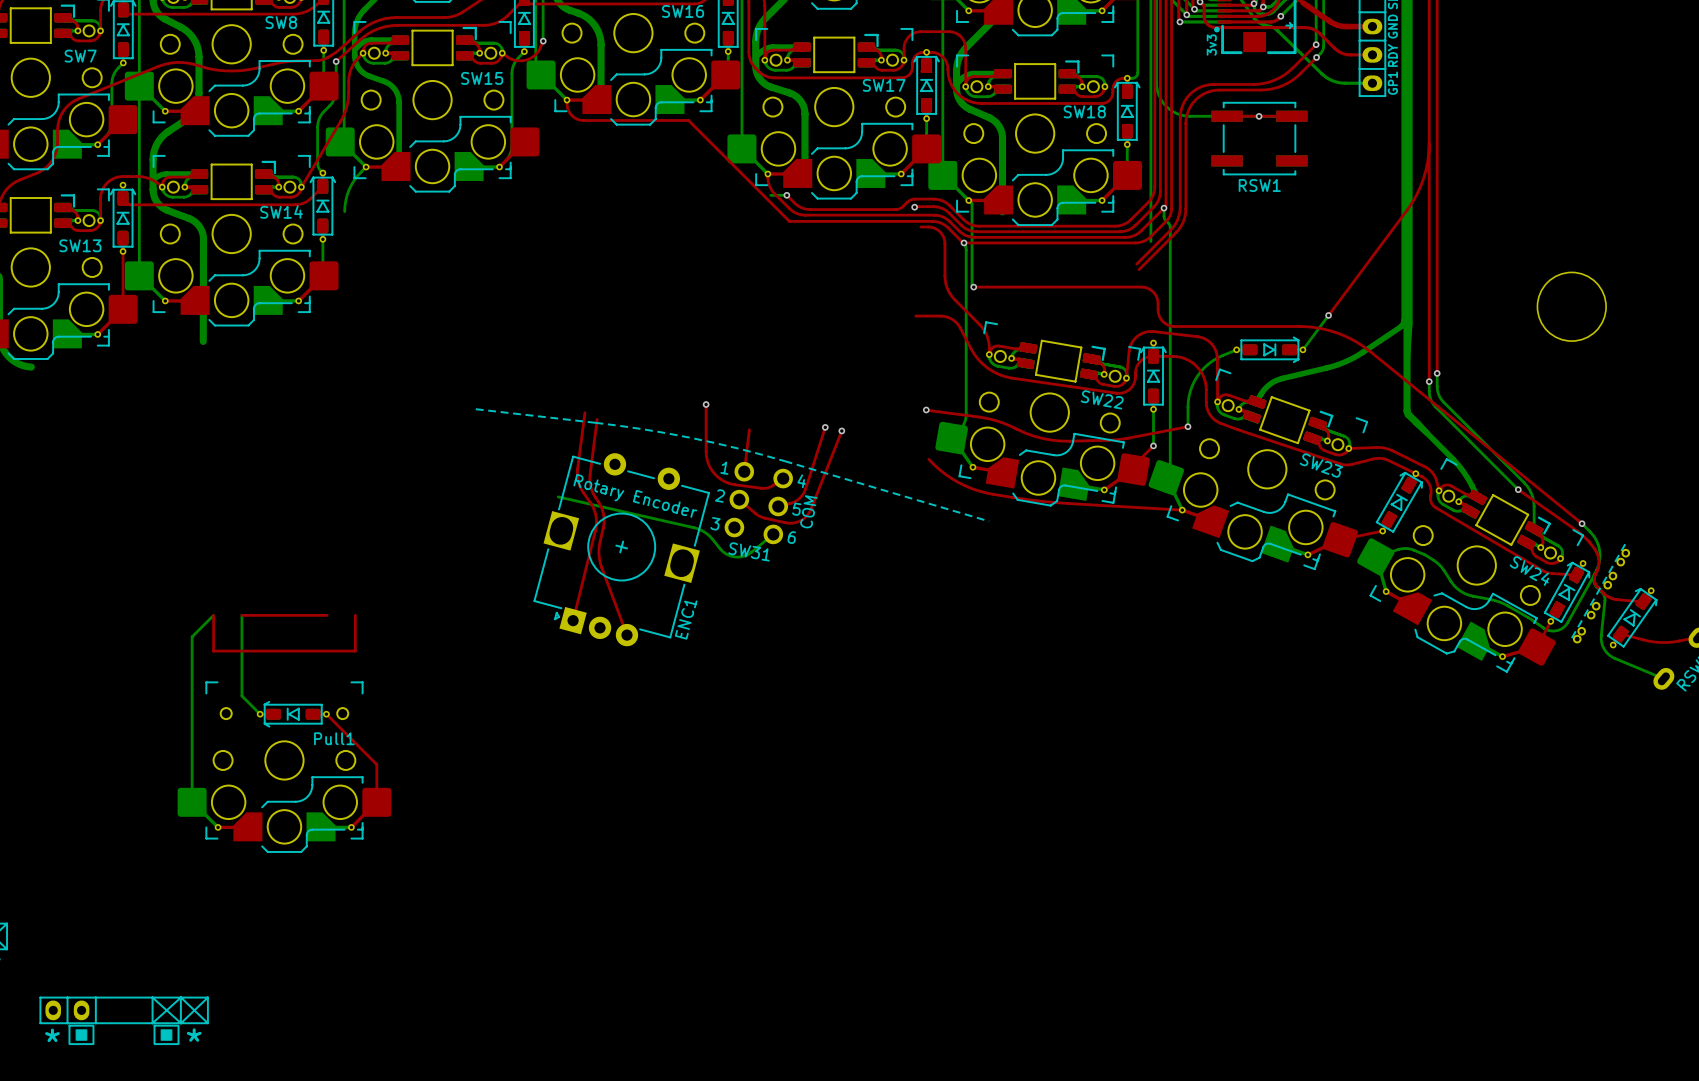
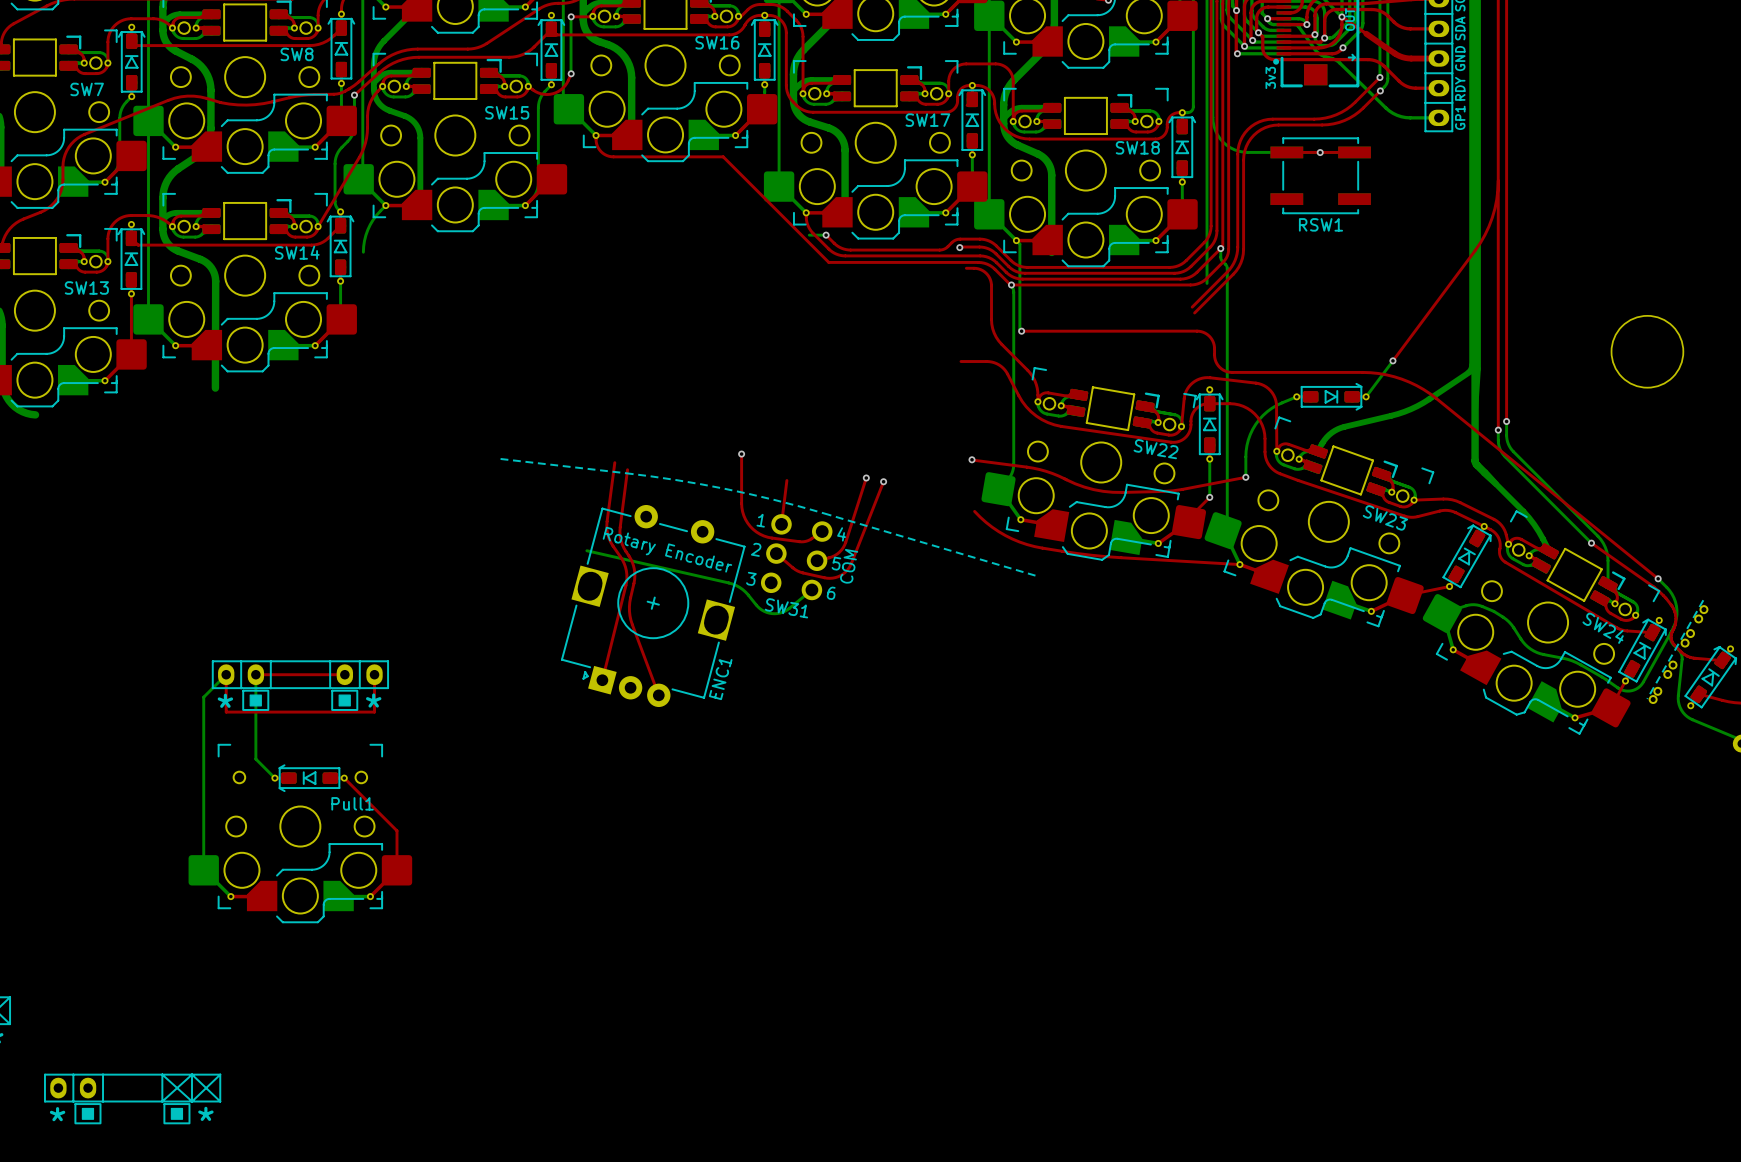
part: none -> (300, 685)

